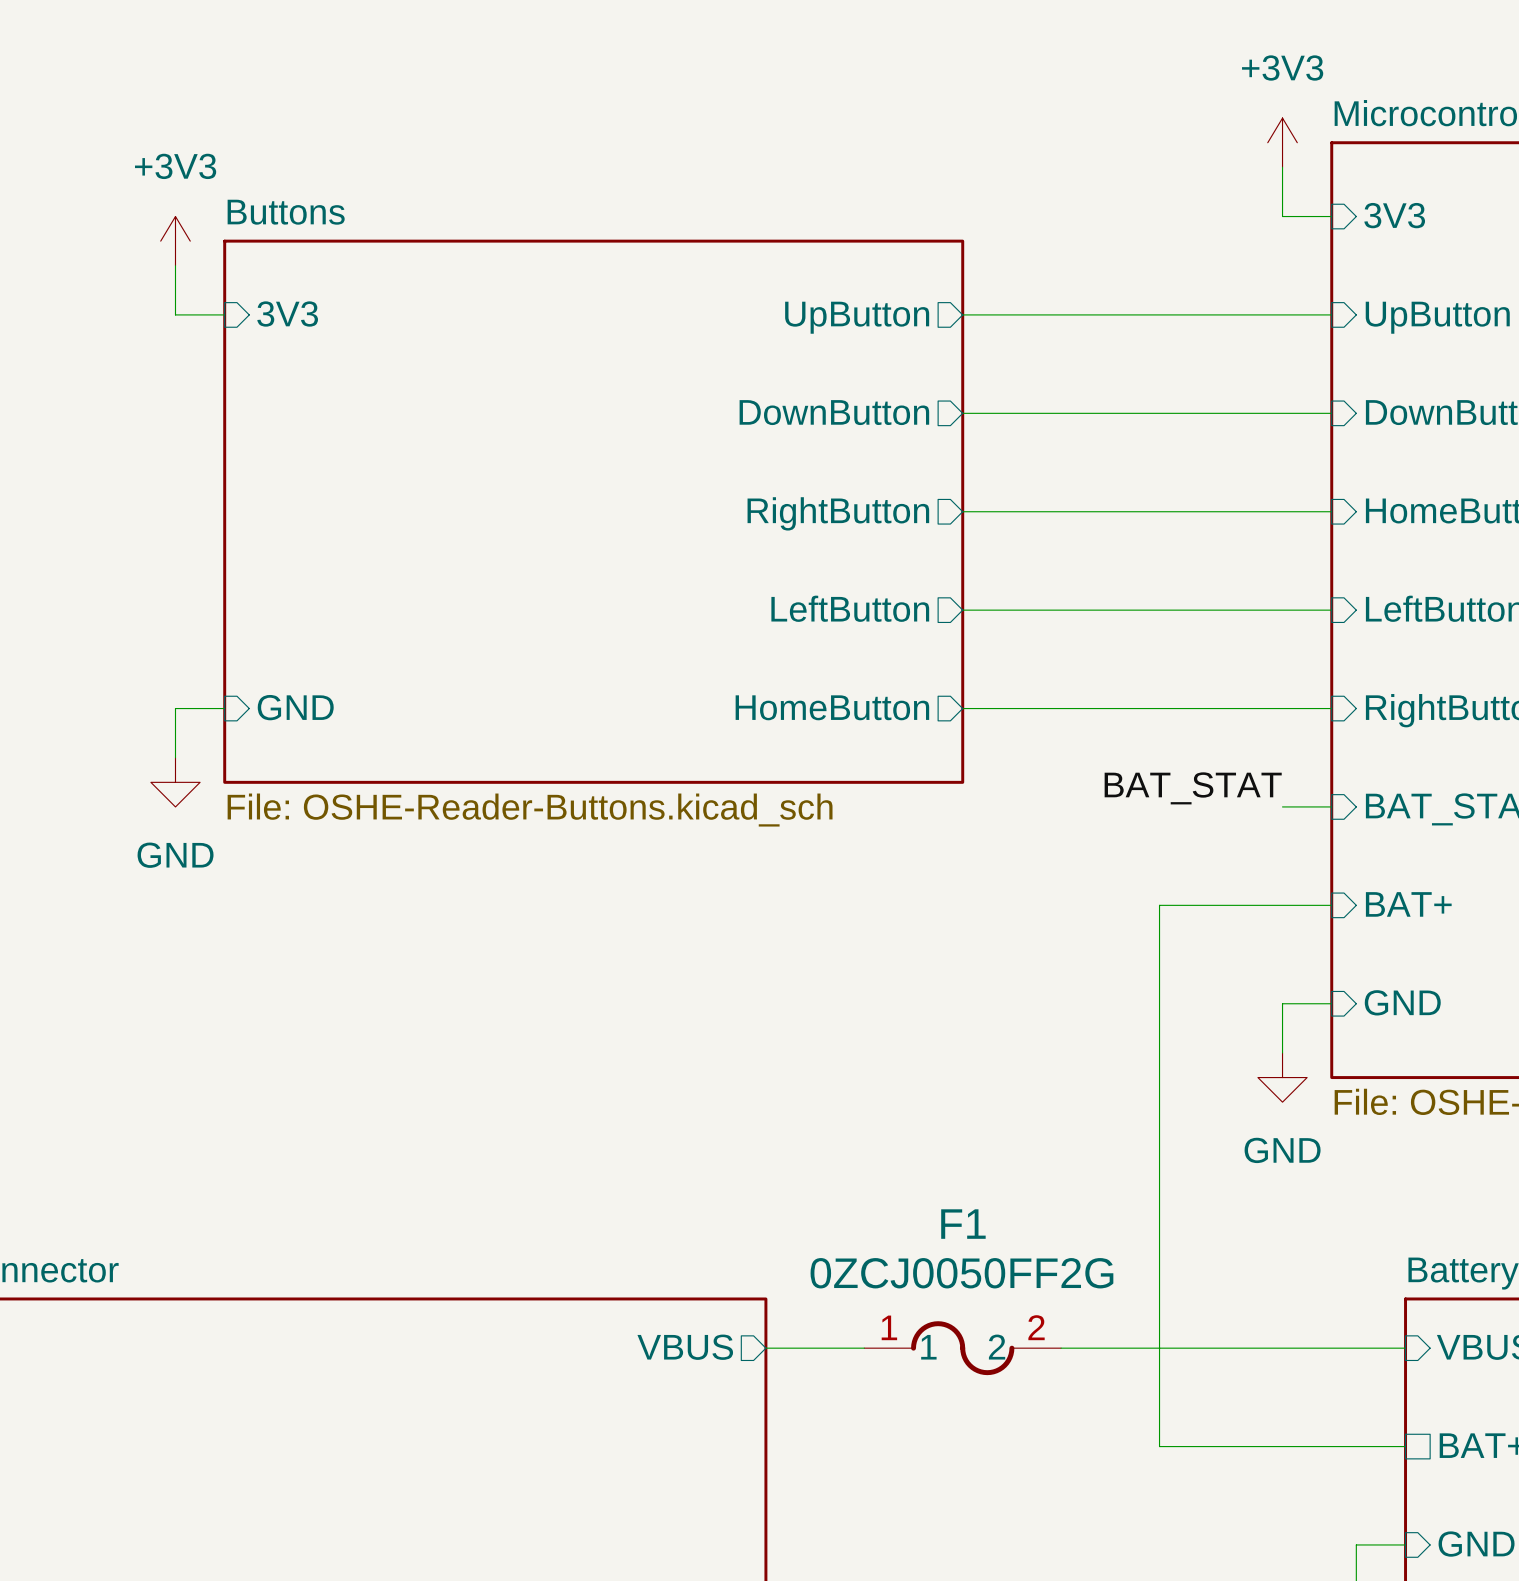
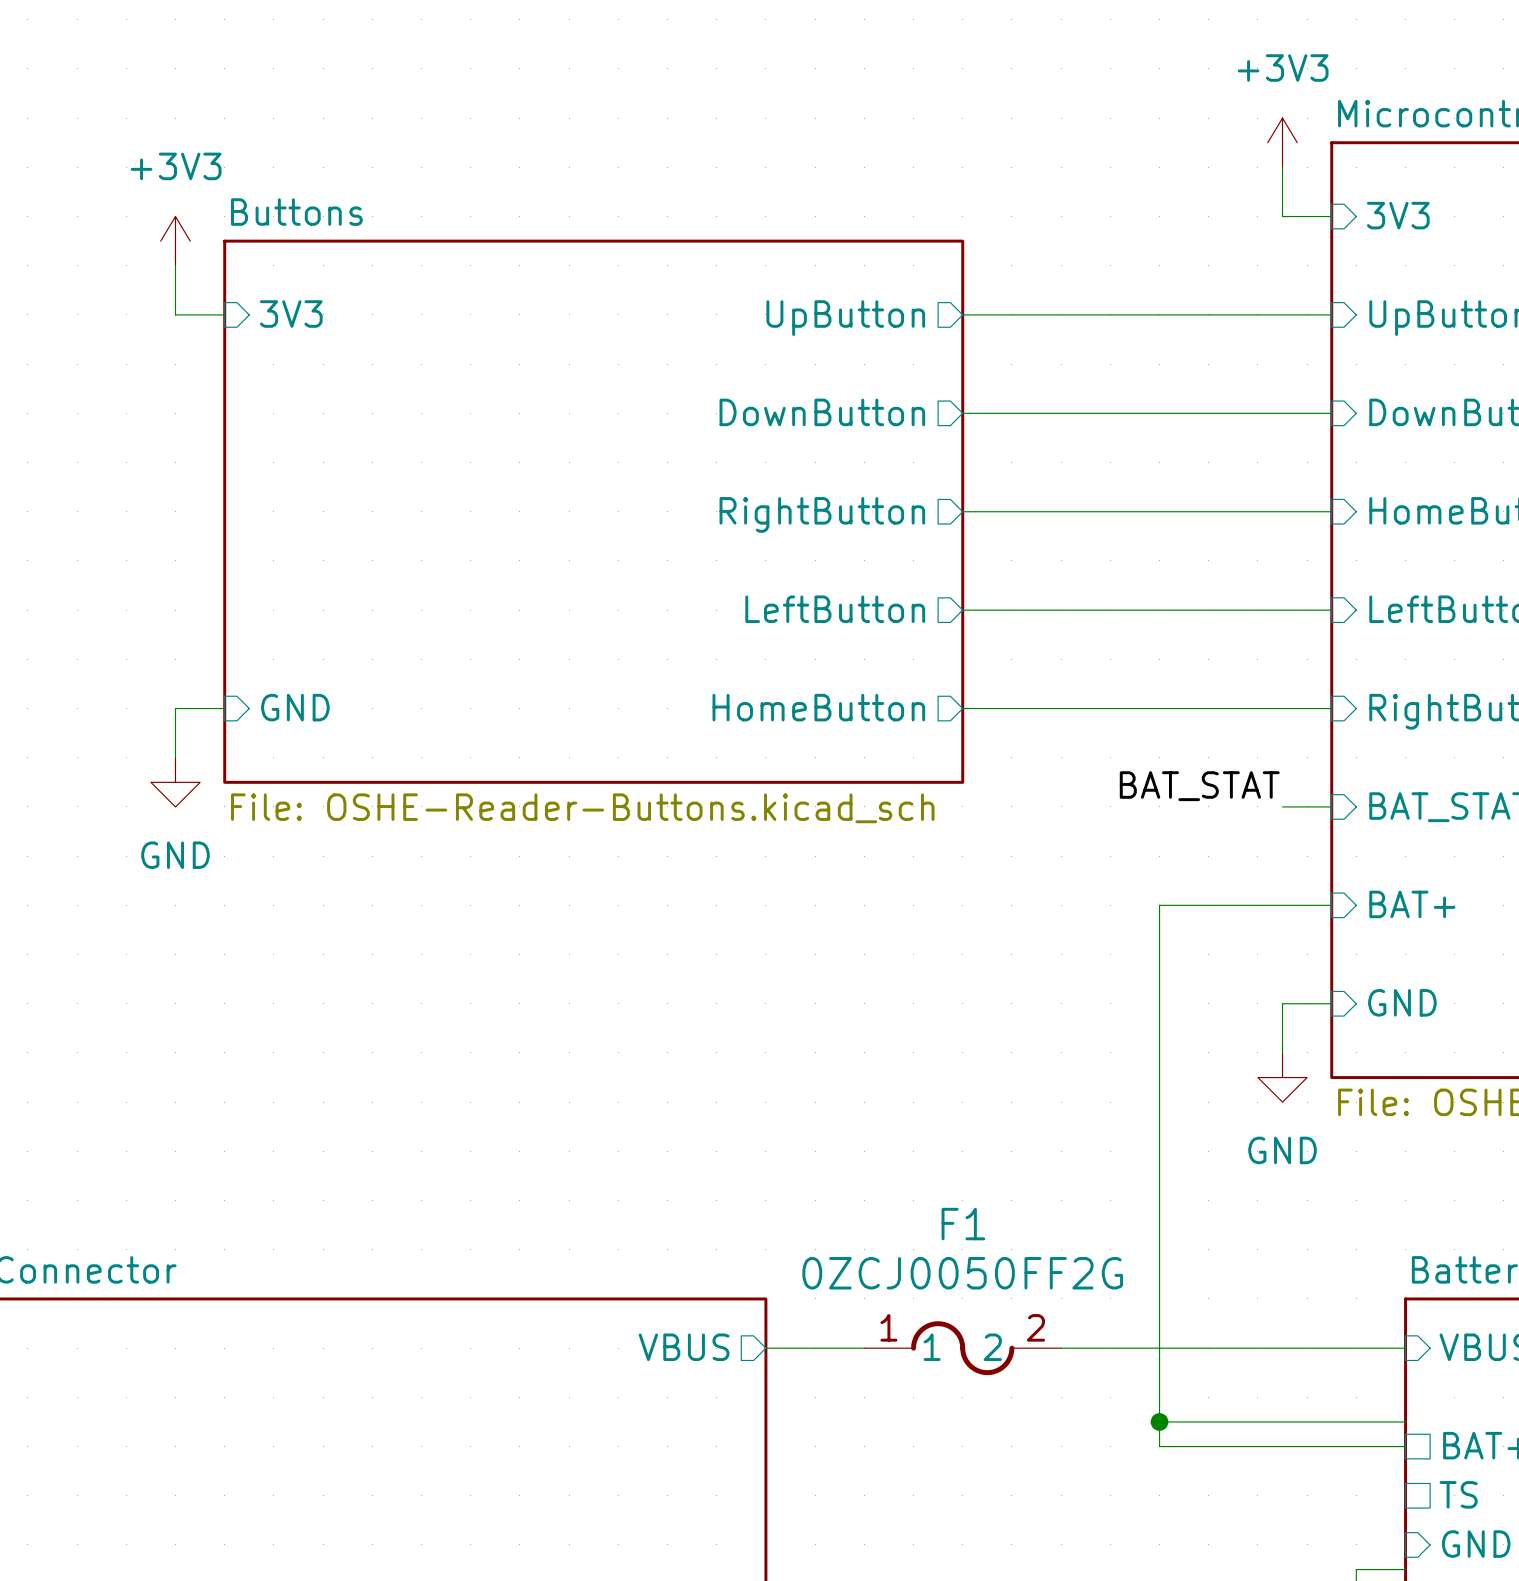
wire: none -> (1159, 1421) (1405, 1421)
junction: none -> (1159, 1421)
sheet pin: none -> TS (1458, 1494)
wire: (1405, 1544) (1356, 1544) (1356, 1569) -> (1405, 1569) (1356, 1569)

